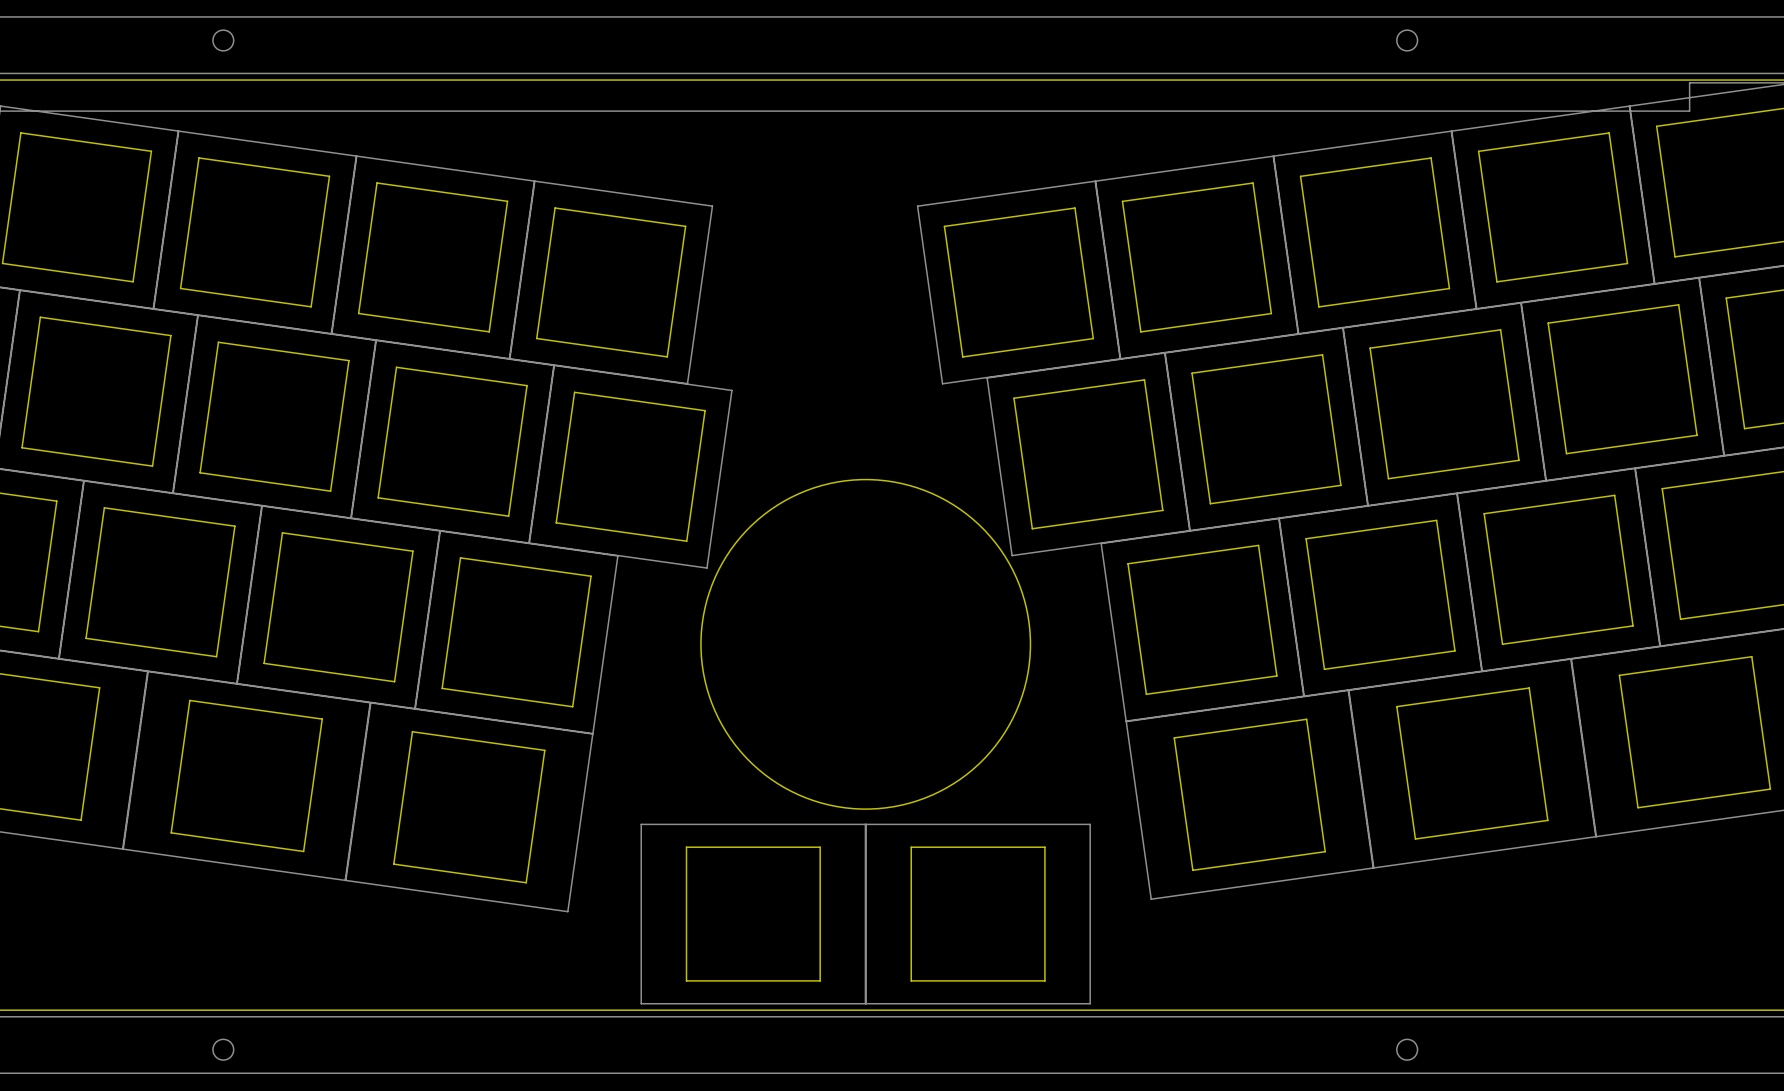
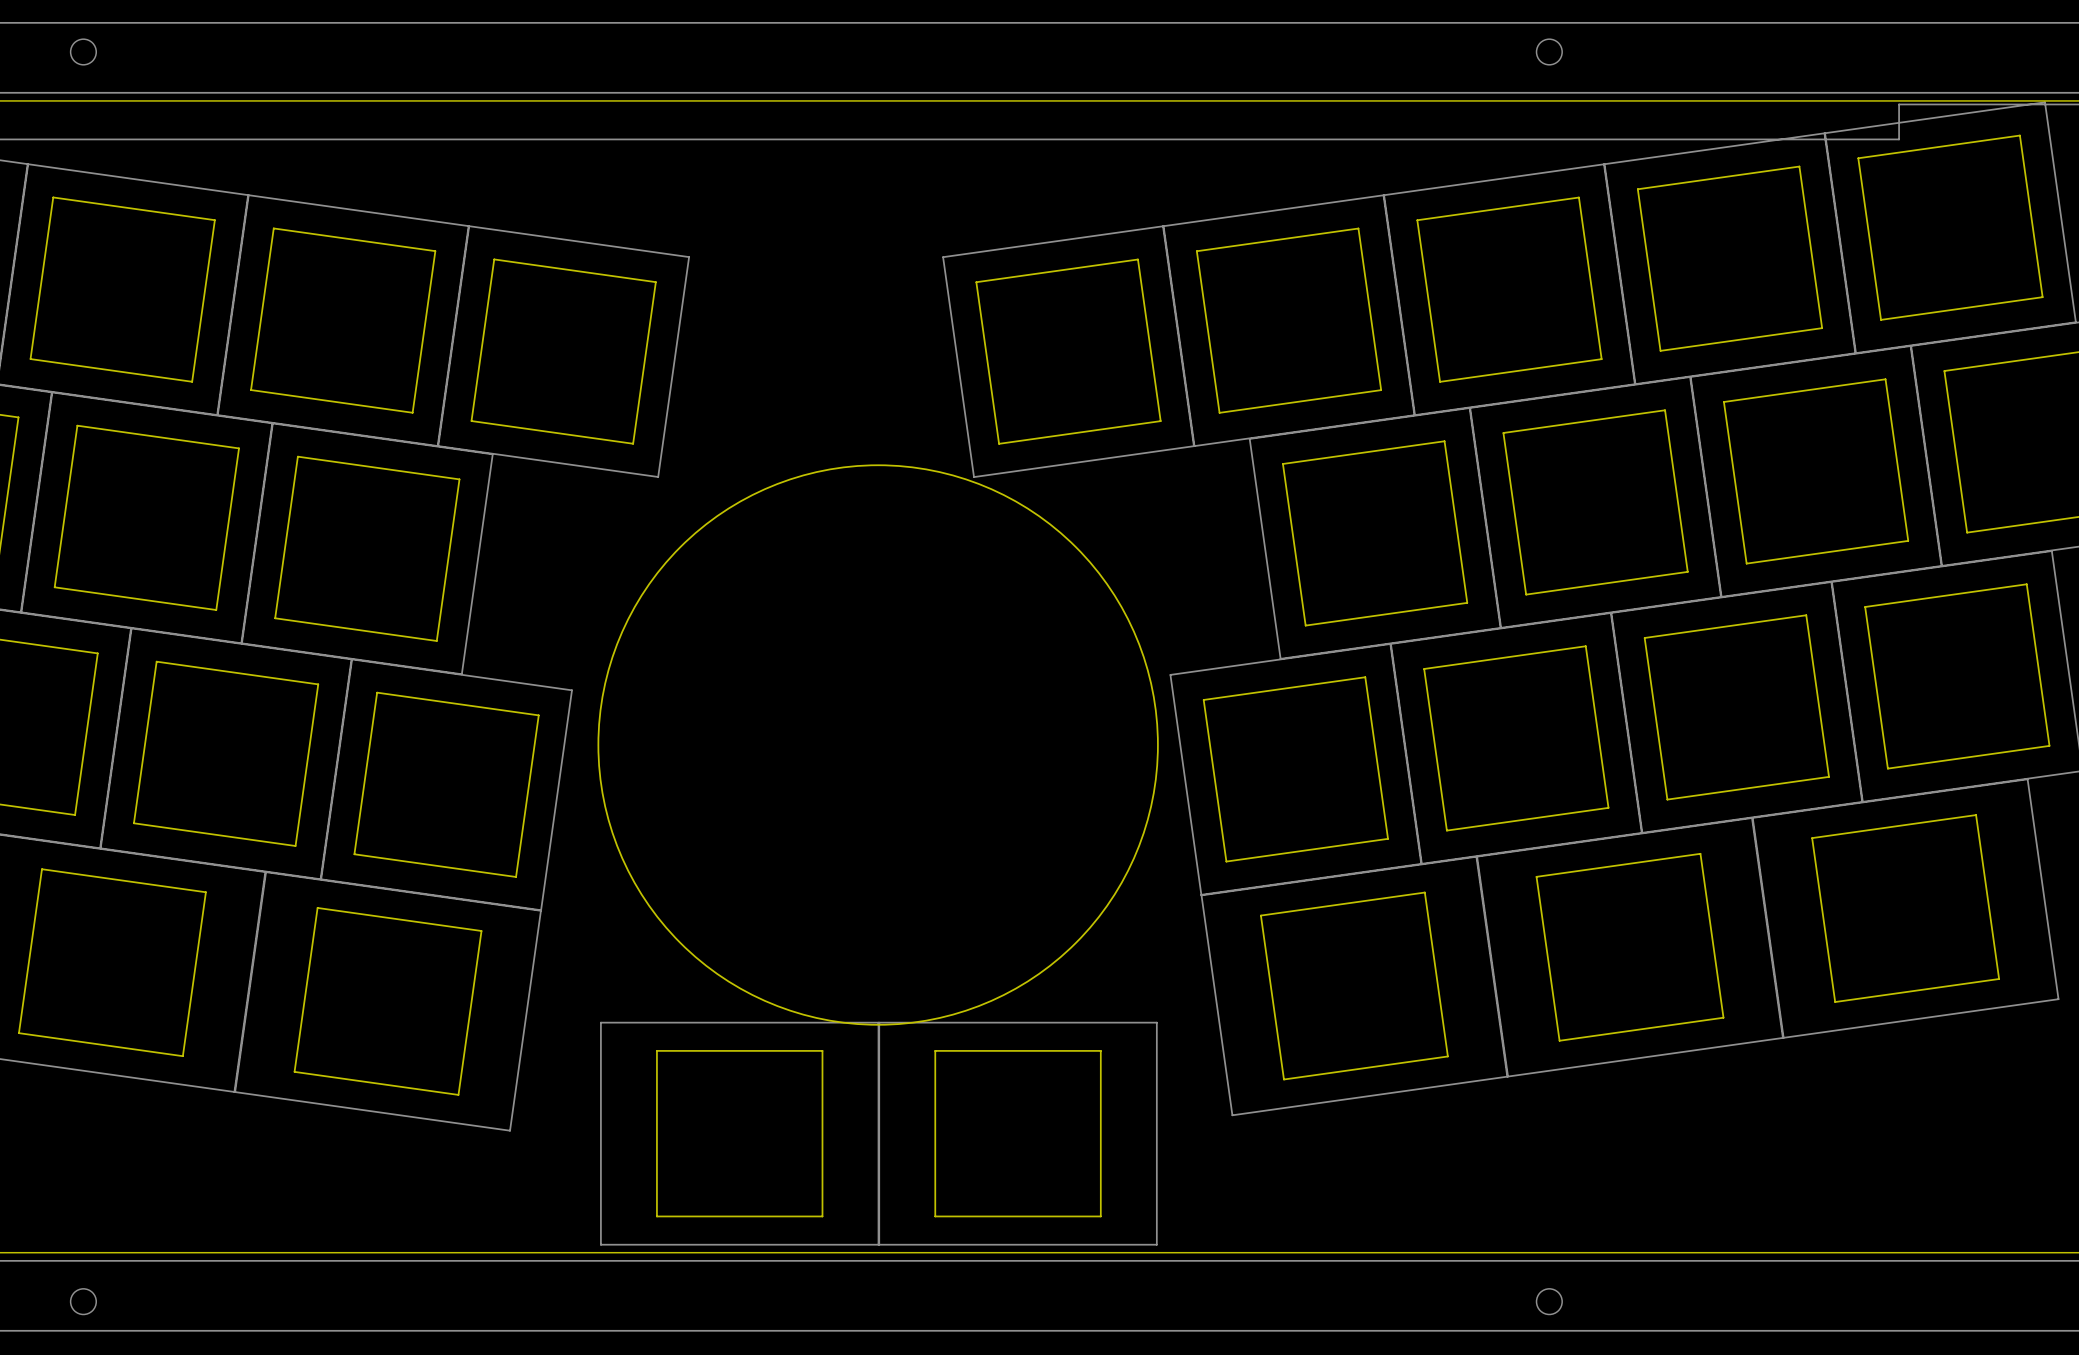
drawing: [986, 352, 1191, 557] -> none
drawing: [528, 364, 733, 569] -> none
round board edge: none -> [597, 464, 1159, 1026]
round board edge: [700, 478, 1032, 810] -> none

